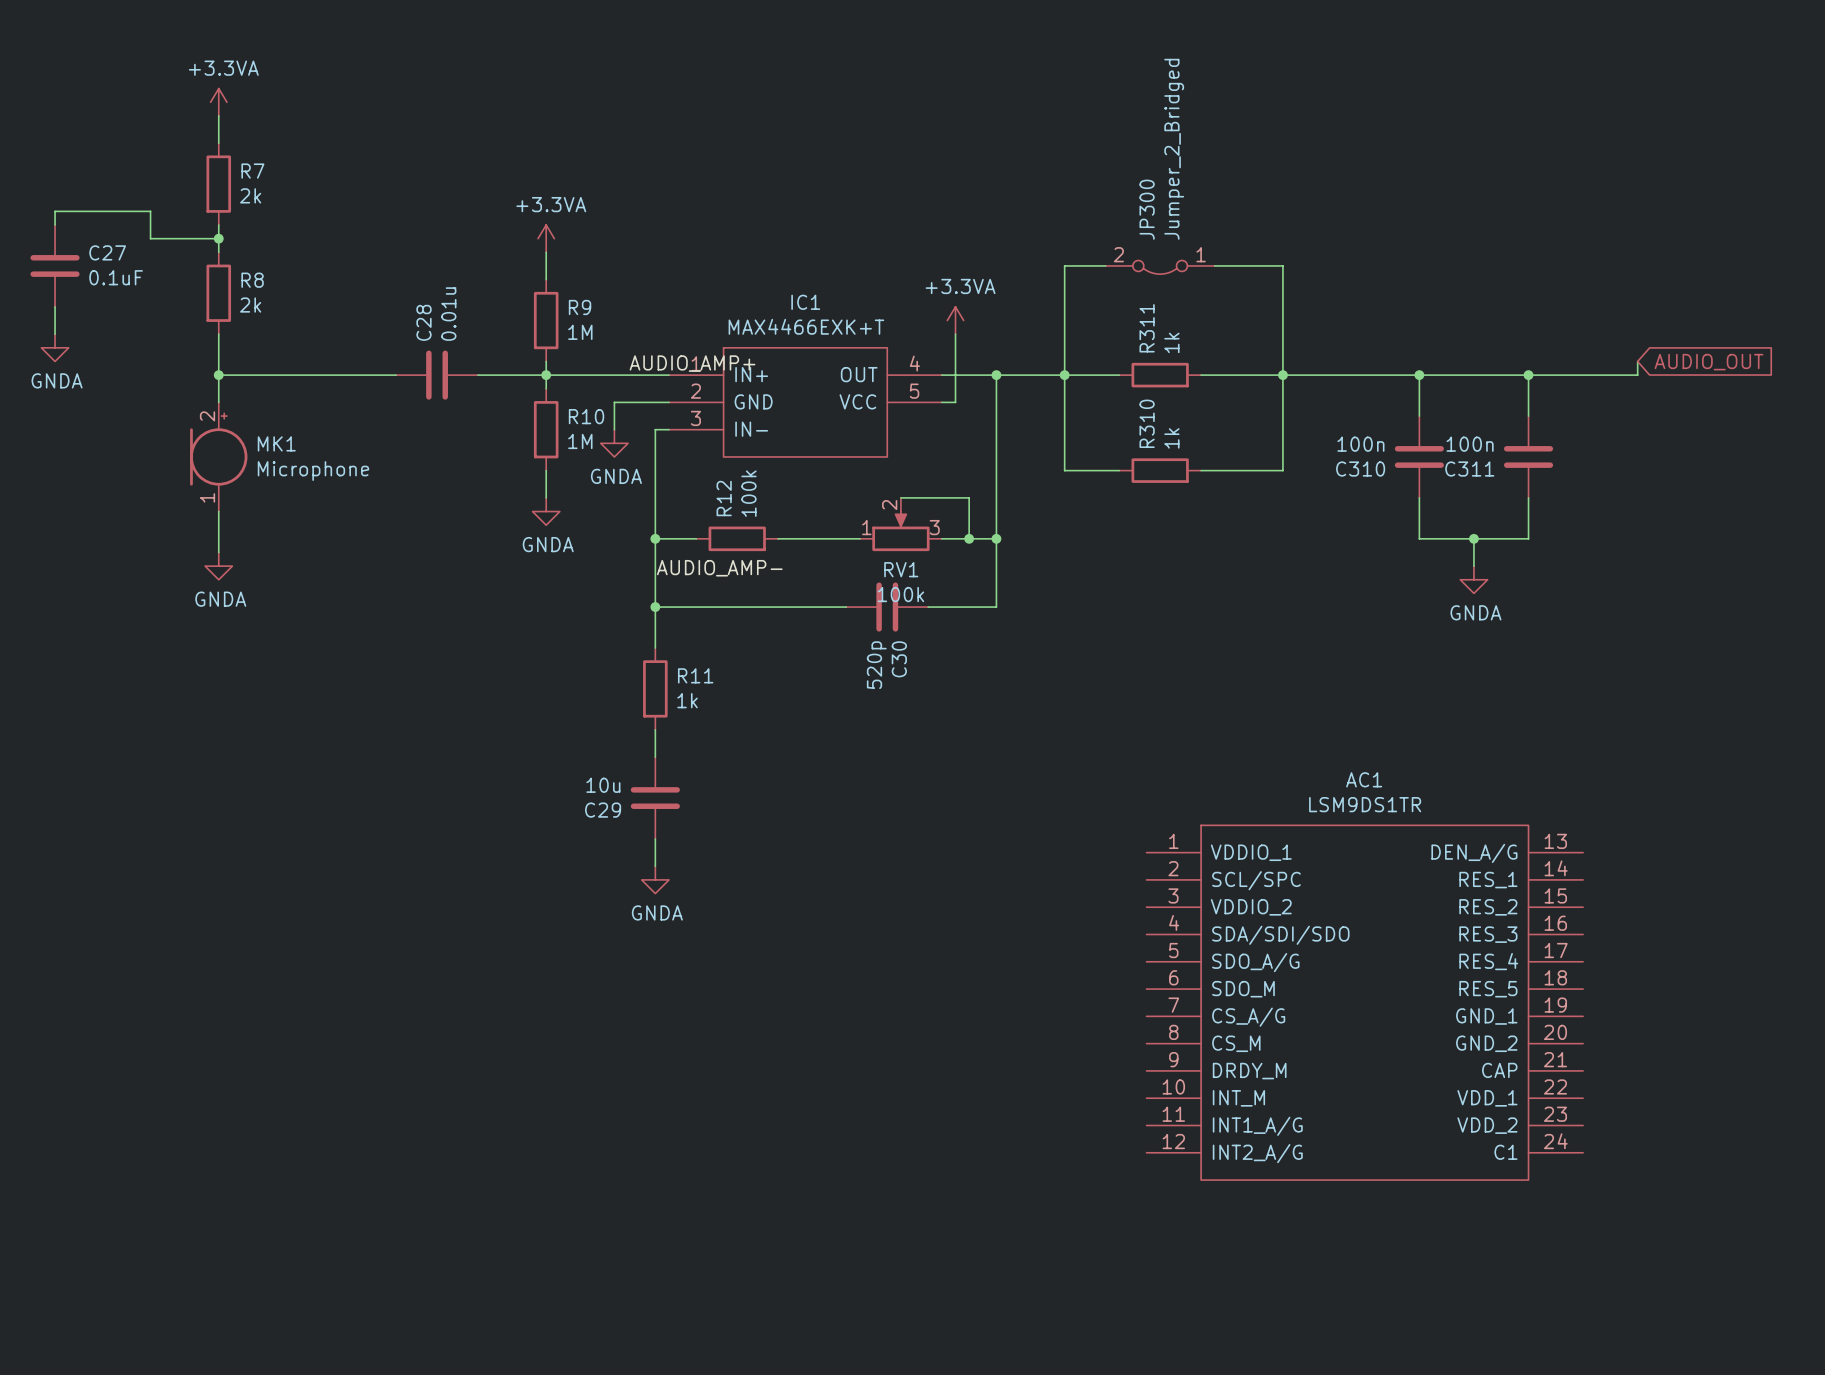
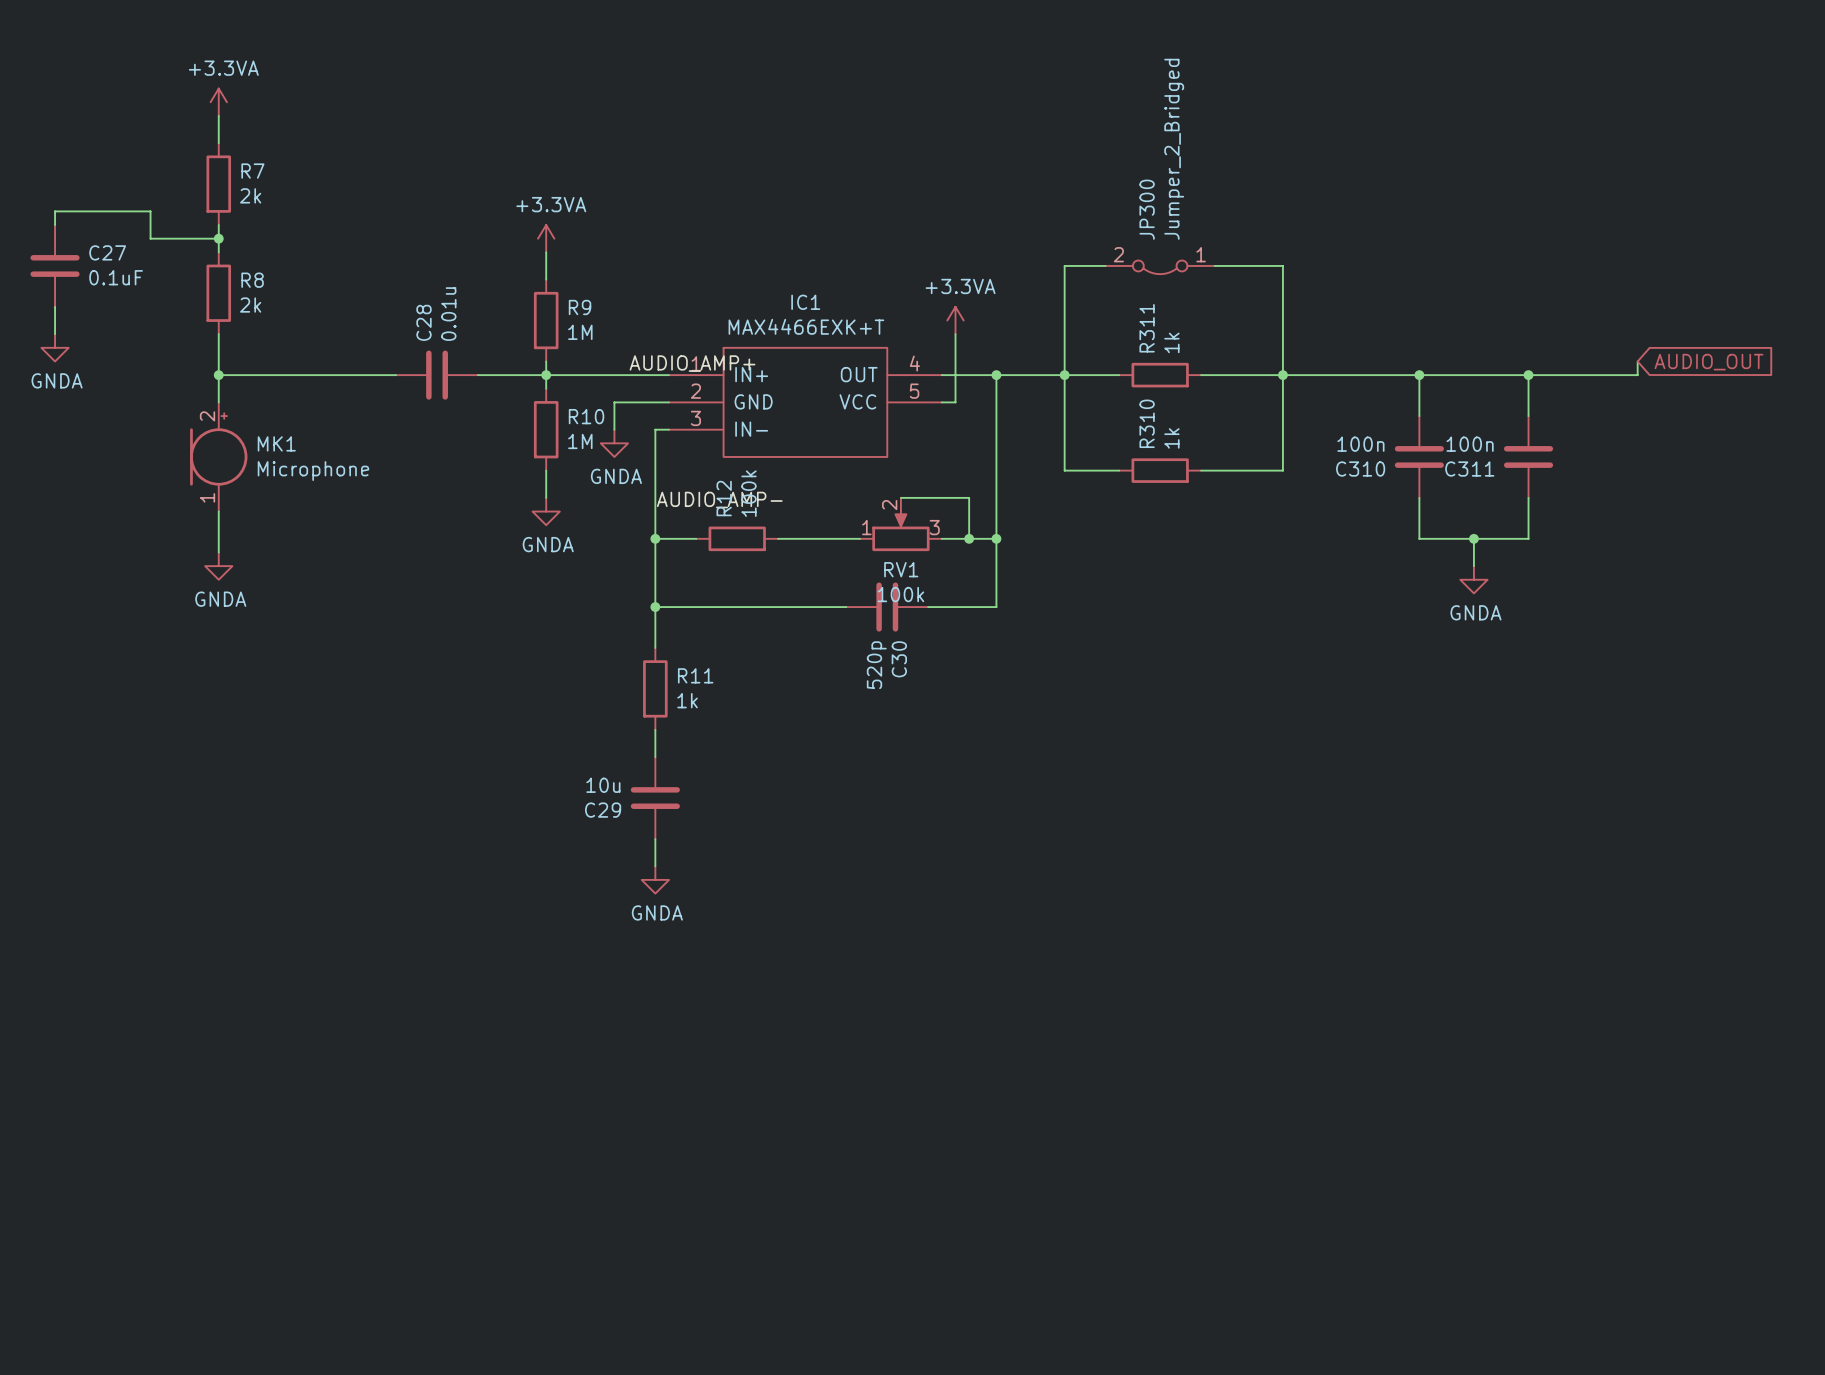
label position: AUDIO_AMP- (719, 568) -> AUDIO_AMP- (719, 500)
AC1: LSM9DS1TR (1364, 1002) -> none

